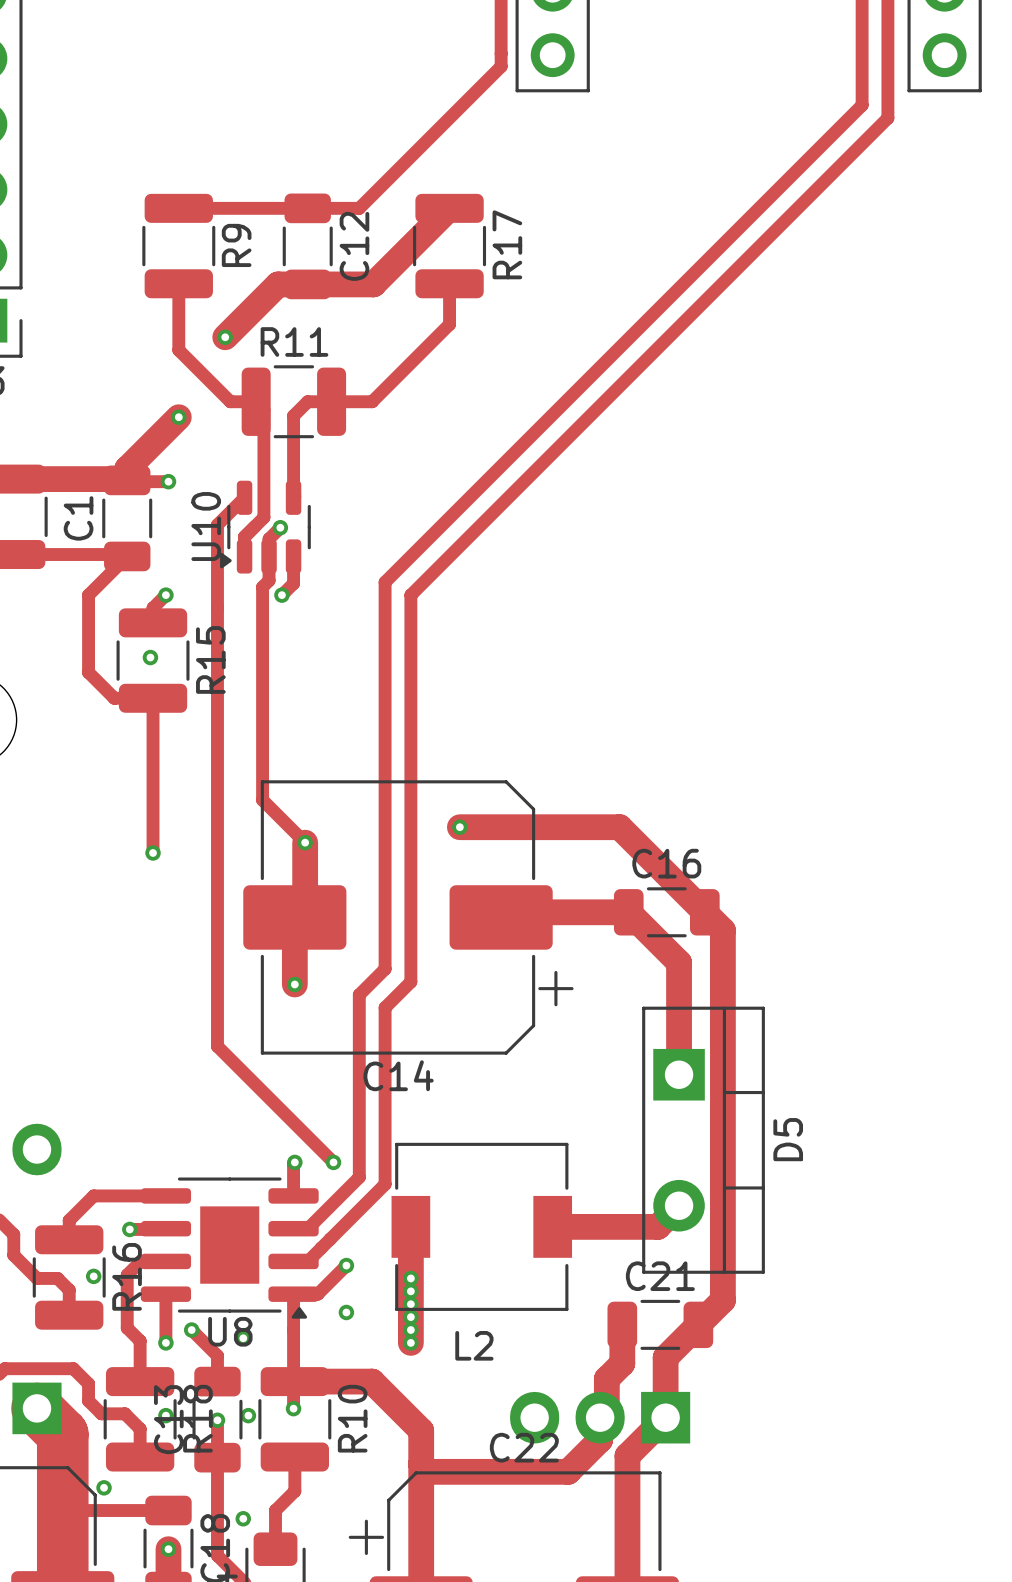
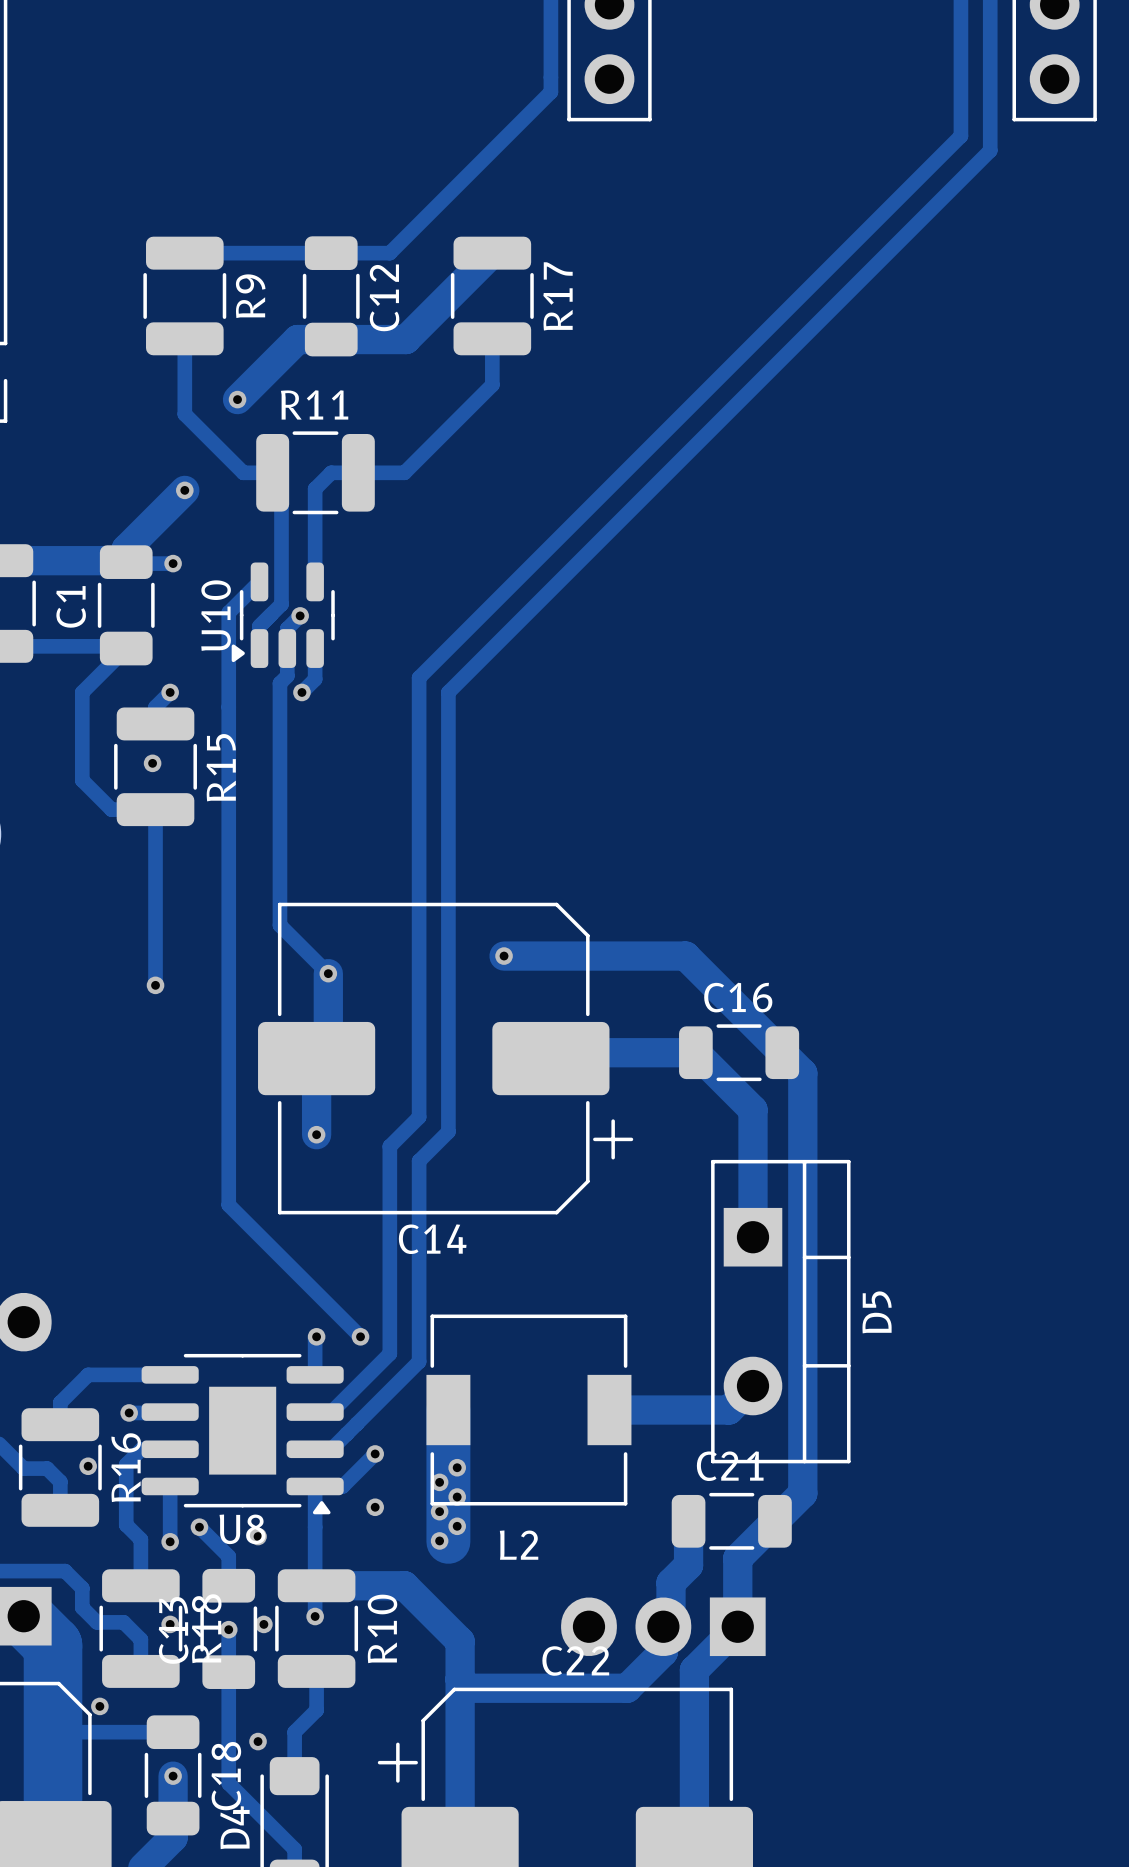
track width: thin (410, 1226) (410, 1342) -> thick (448, 1410) (448, 1541)
via: none -> (457, 1467)
via: (410, 1278) -> none
via: none -> (439, 1482)
via: (410, 1291) -> none
via: none -> (457, 1497)
via: (410, 1304) -> none
via: none -> (439, 1511)
via: (410, 1317) -> none
via: none -> (457, 1526)
via: (410, 1330) -> none
via: none -> (439, 1540)
via: (410, 1342) -> none

